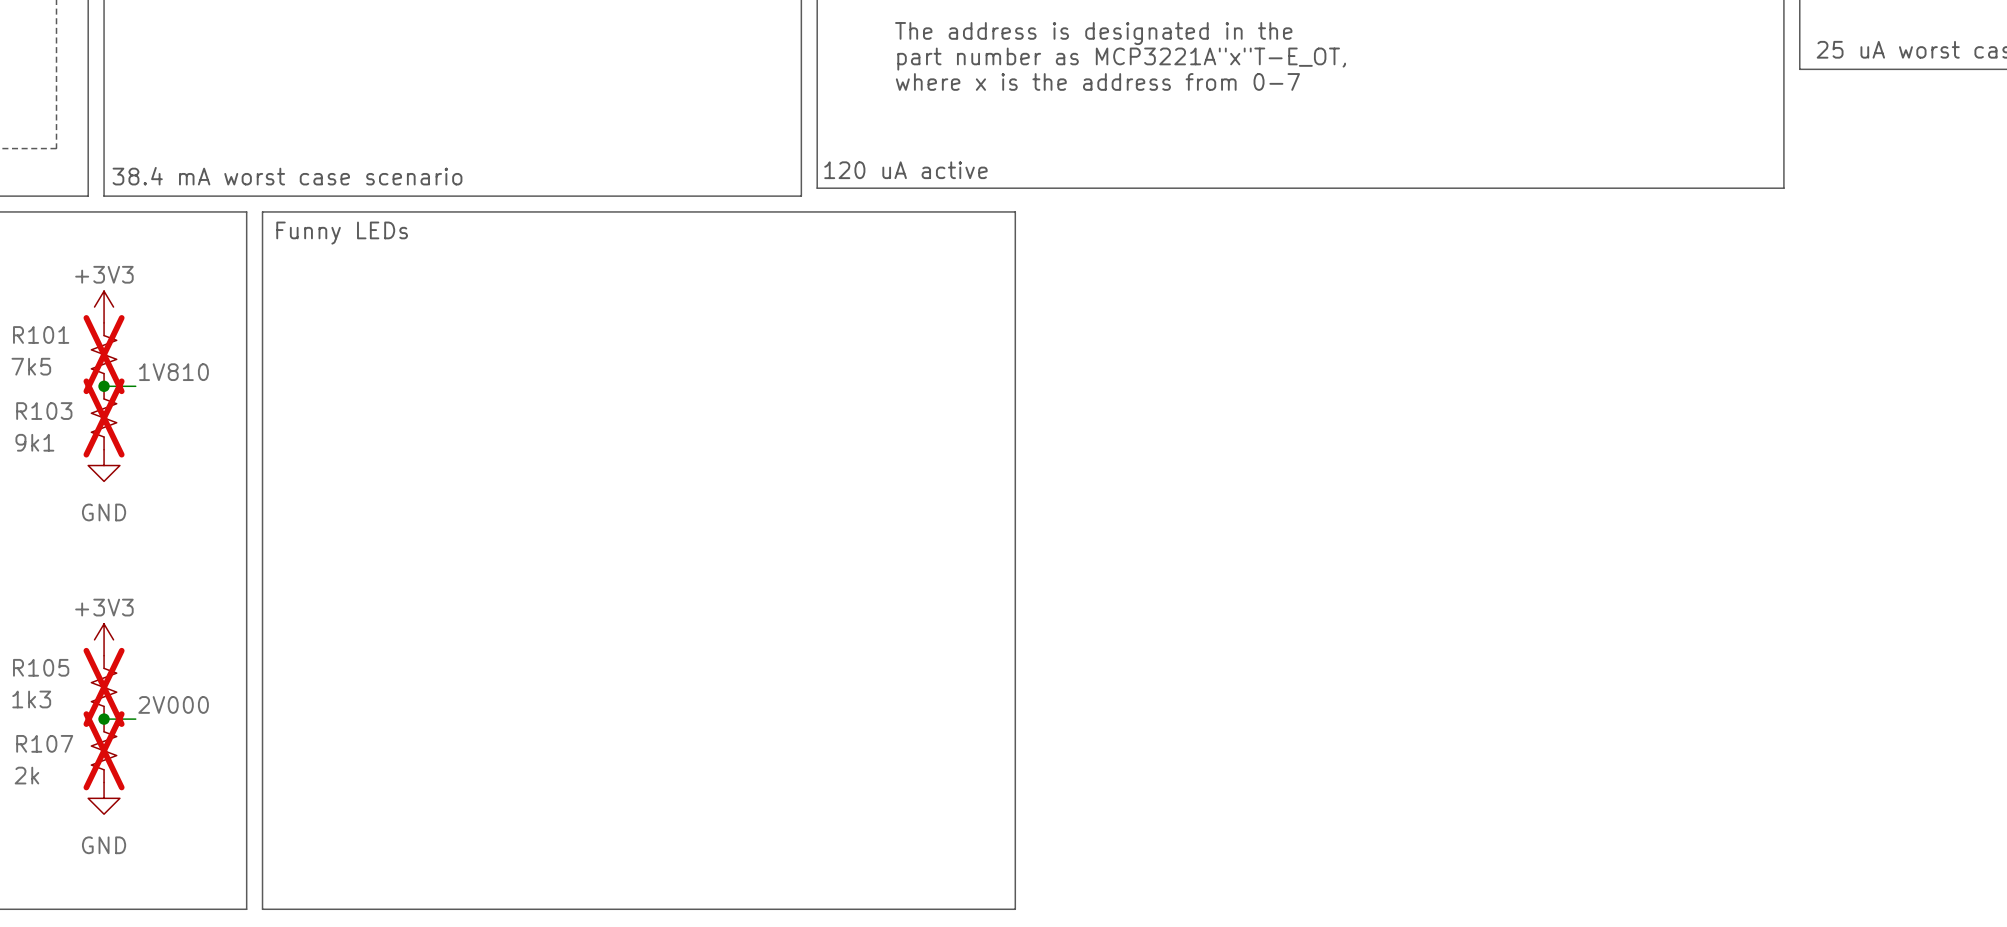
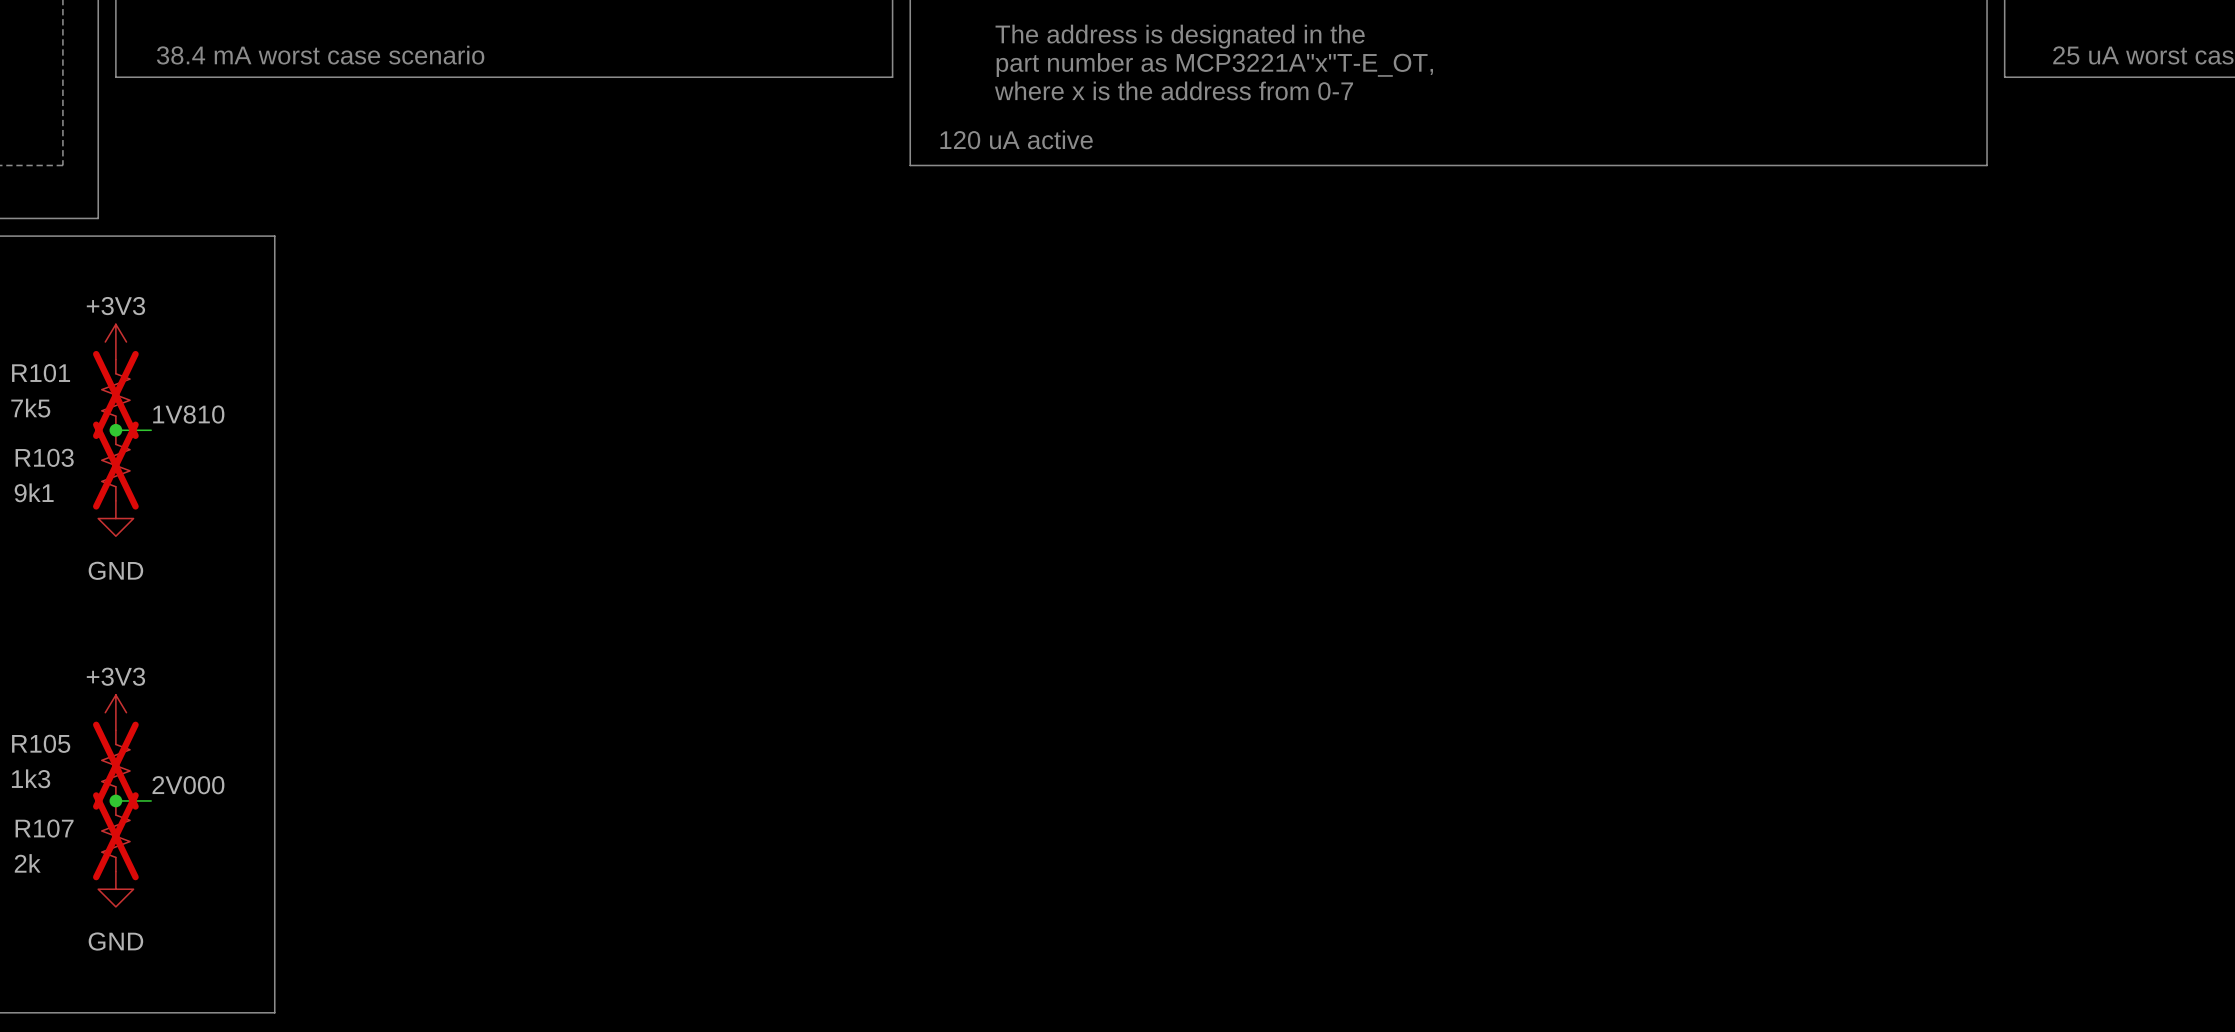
line: (104, 69) (104, 196) (801, 196) (801, 69) -> (115, 77) (892, 77)
line: (817, 148) (817, 188) (1783, 188) (1783, 148) -> (910, 165) (1987, 165)
text position: 120 uA active (905, 170) -> 120 uA active (1016, 139)
text position: 38.4 mA worst case scenario (287, 176) -> 38.4 mA worst case scenario (320, 55)
line: (262, 211) (1015, 211) (1015, 909) (262, 909) (262, 211) -> none
text: Funny LEDs (342, 233) -> none

